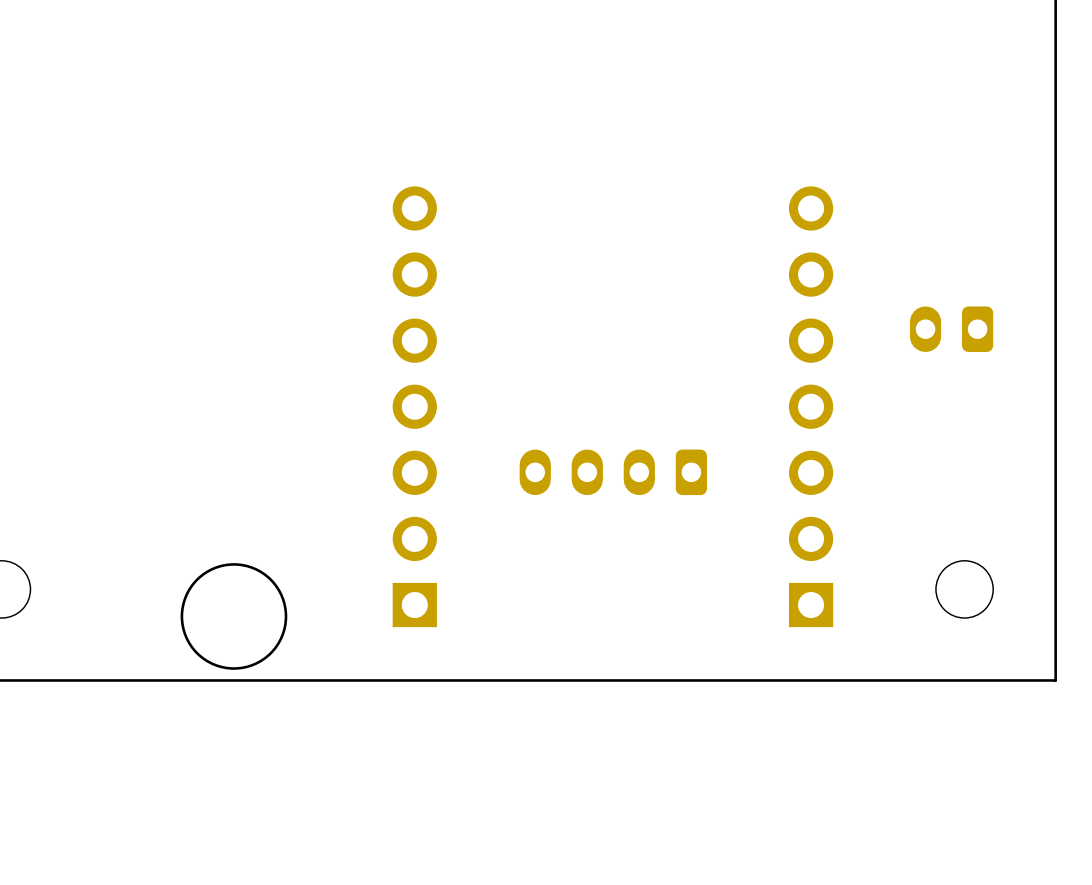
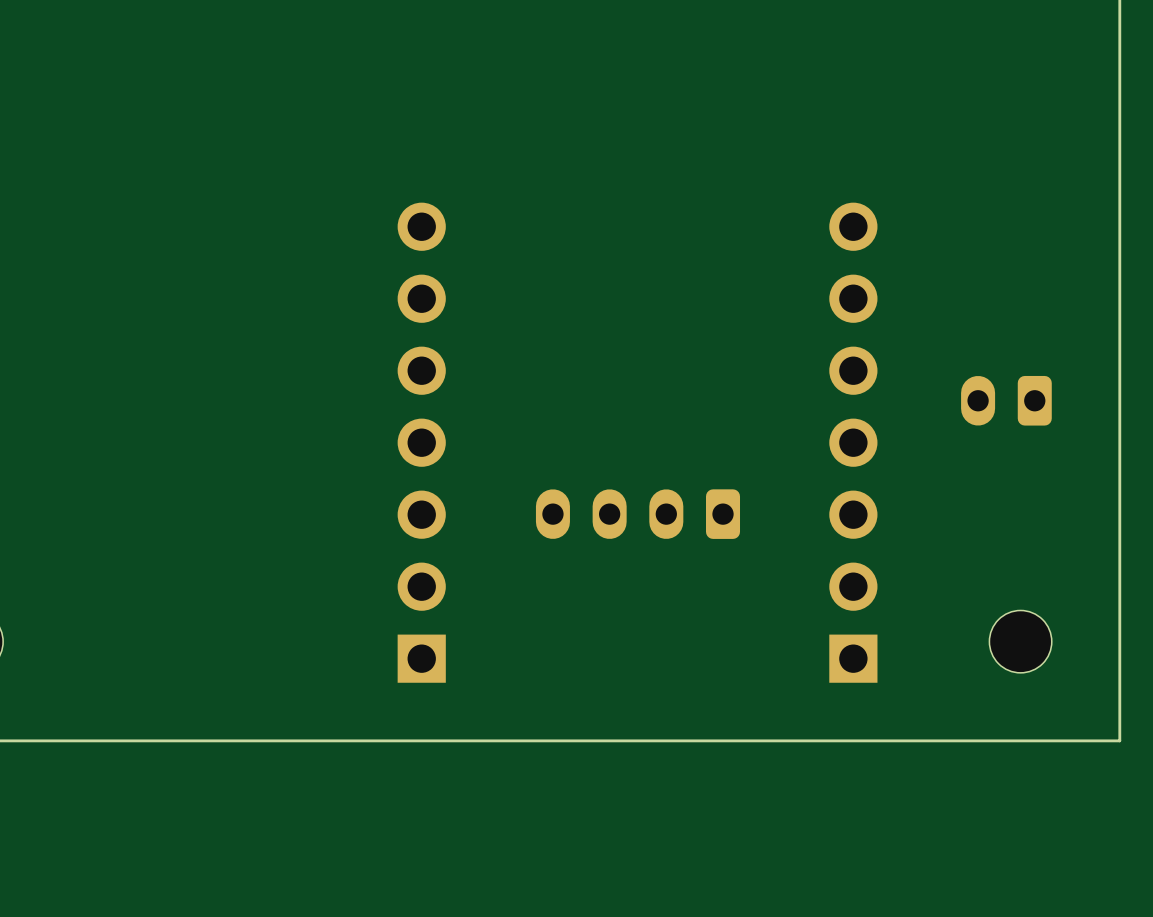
part position: (951, 329) -> (1006, 400)
round board edge: [180, 563, 288, 670] -> none

